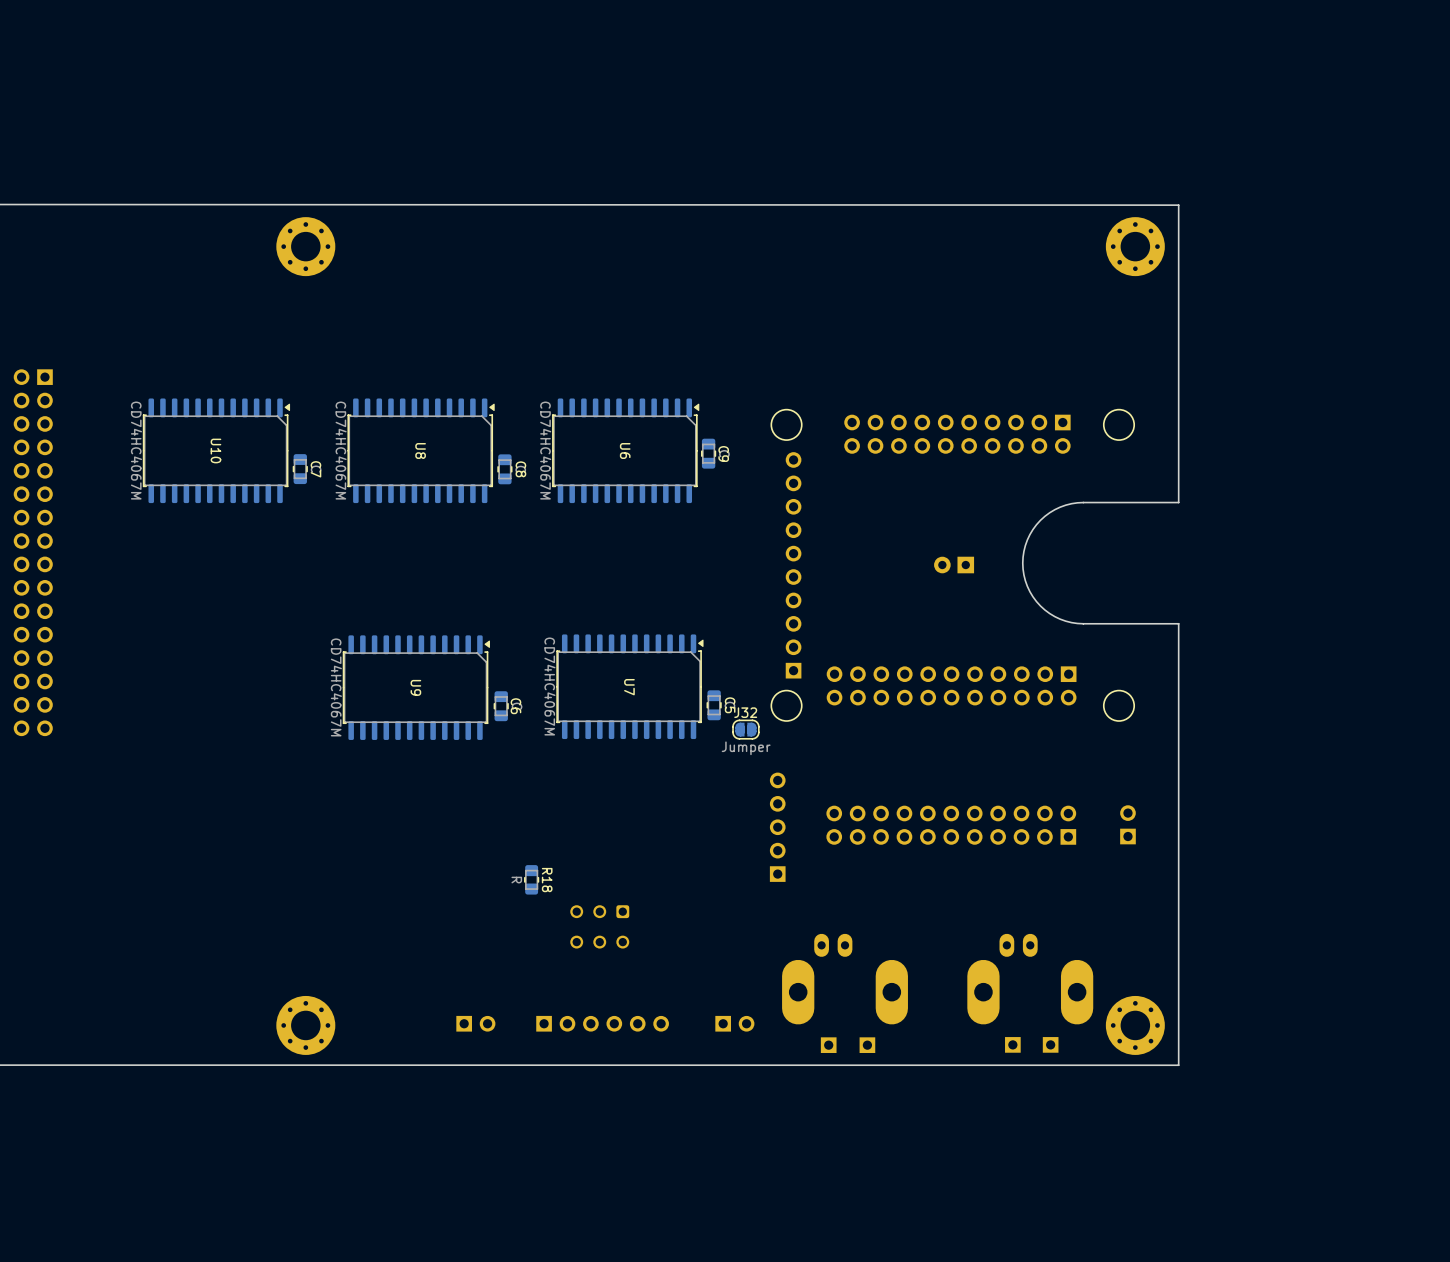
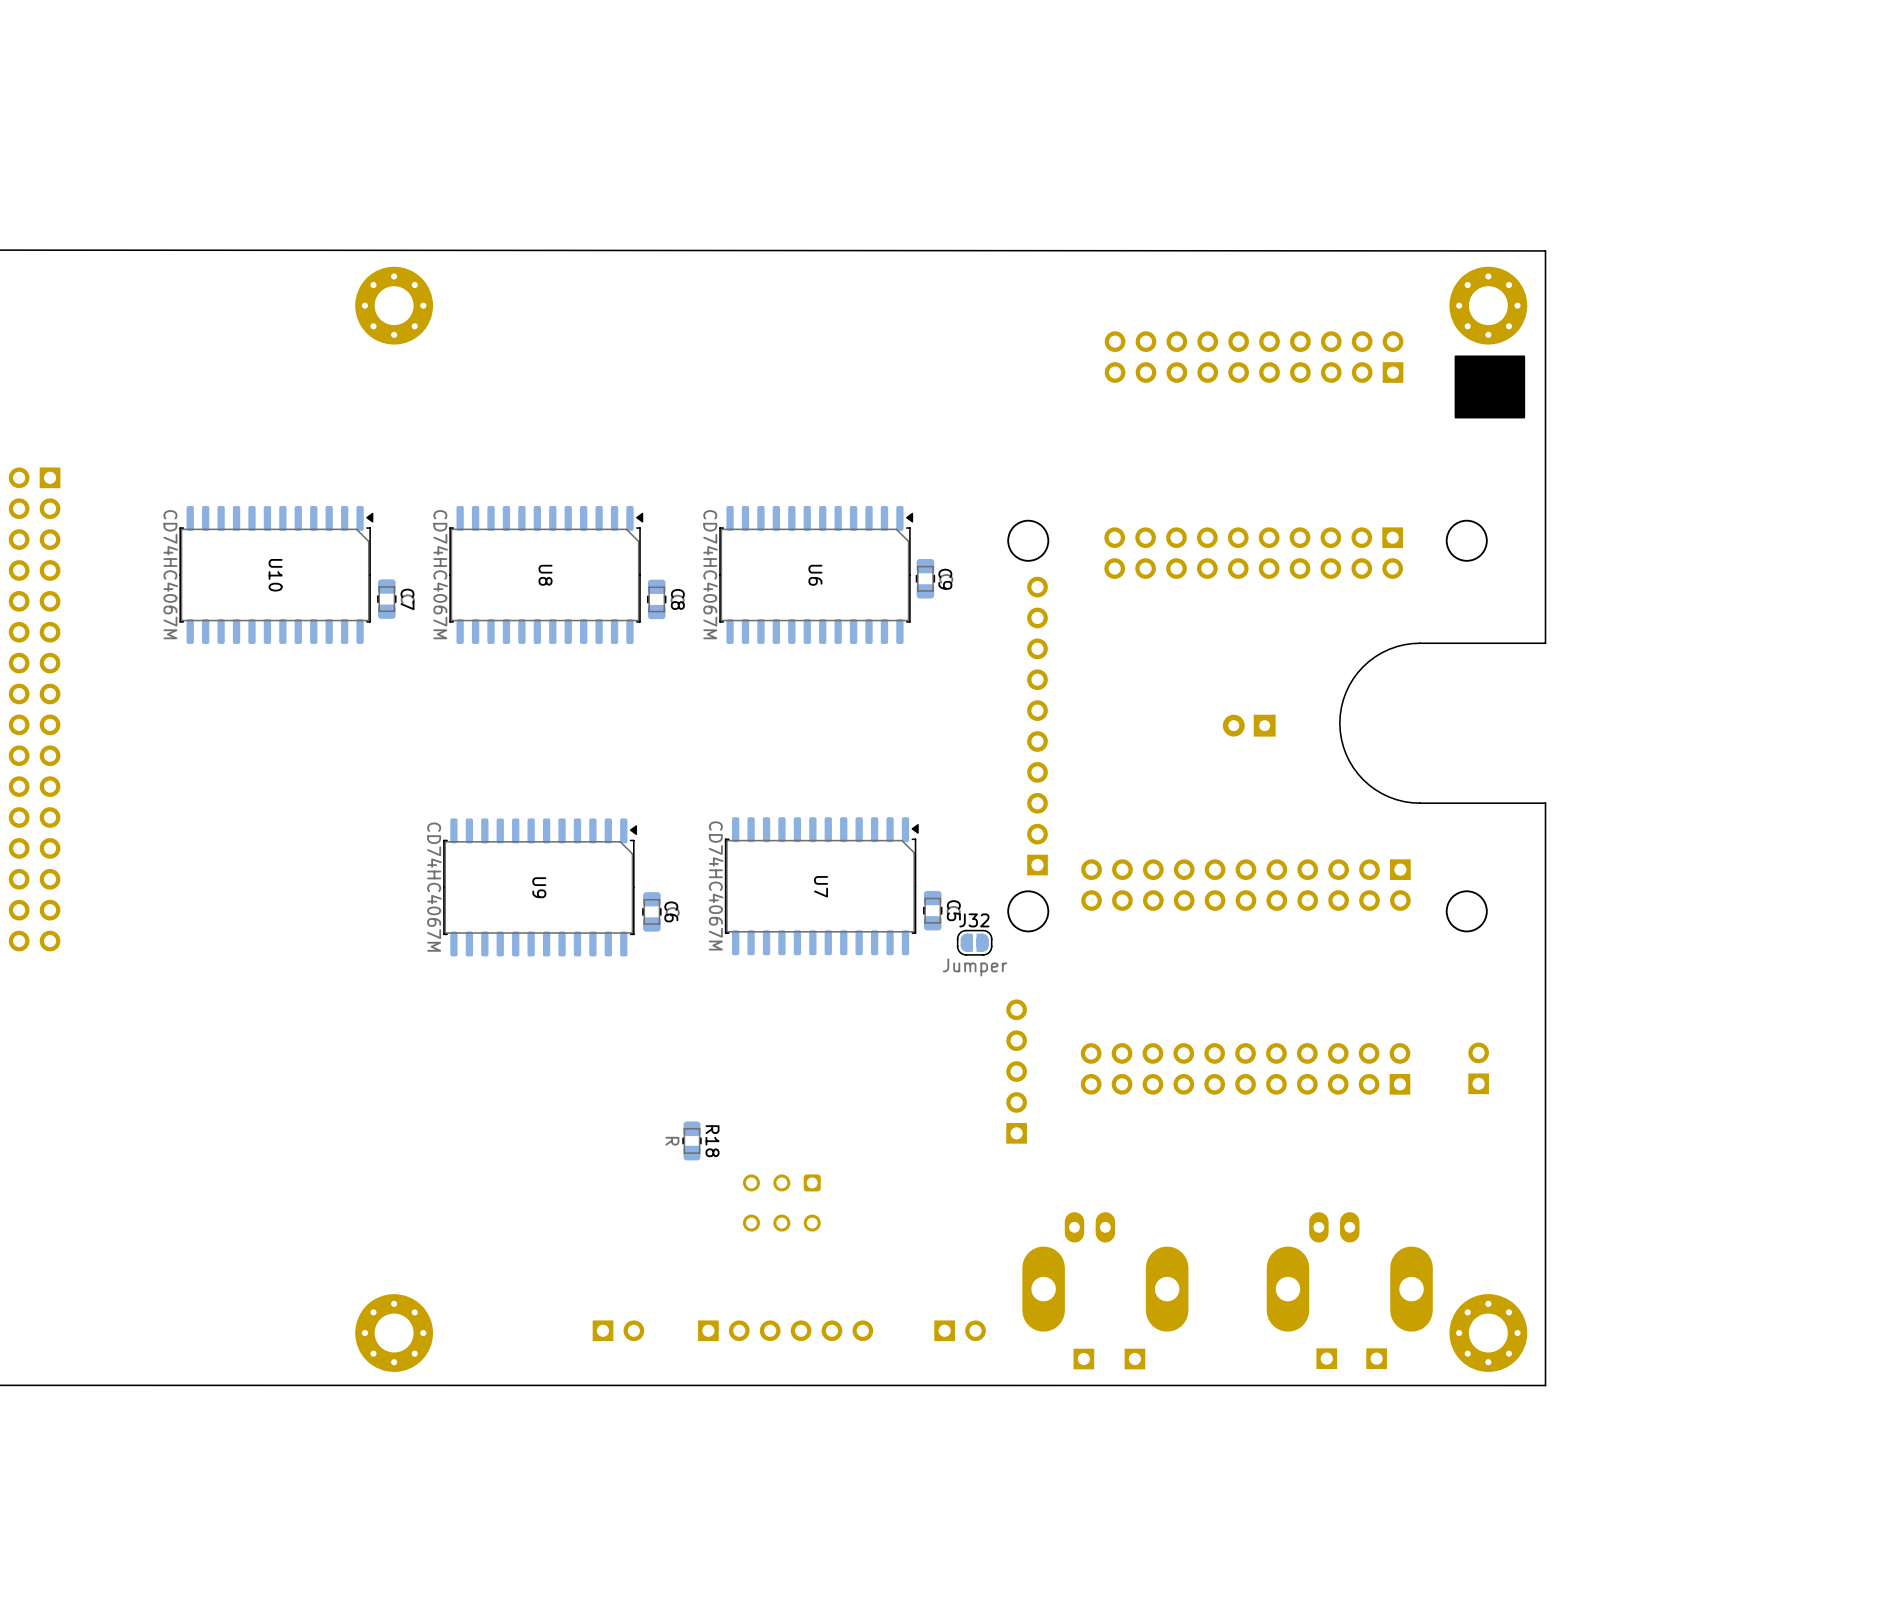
drawing: none -> [1454, 355, 1526, 419]
part: none -> (1254, 357)

